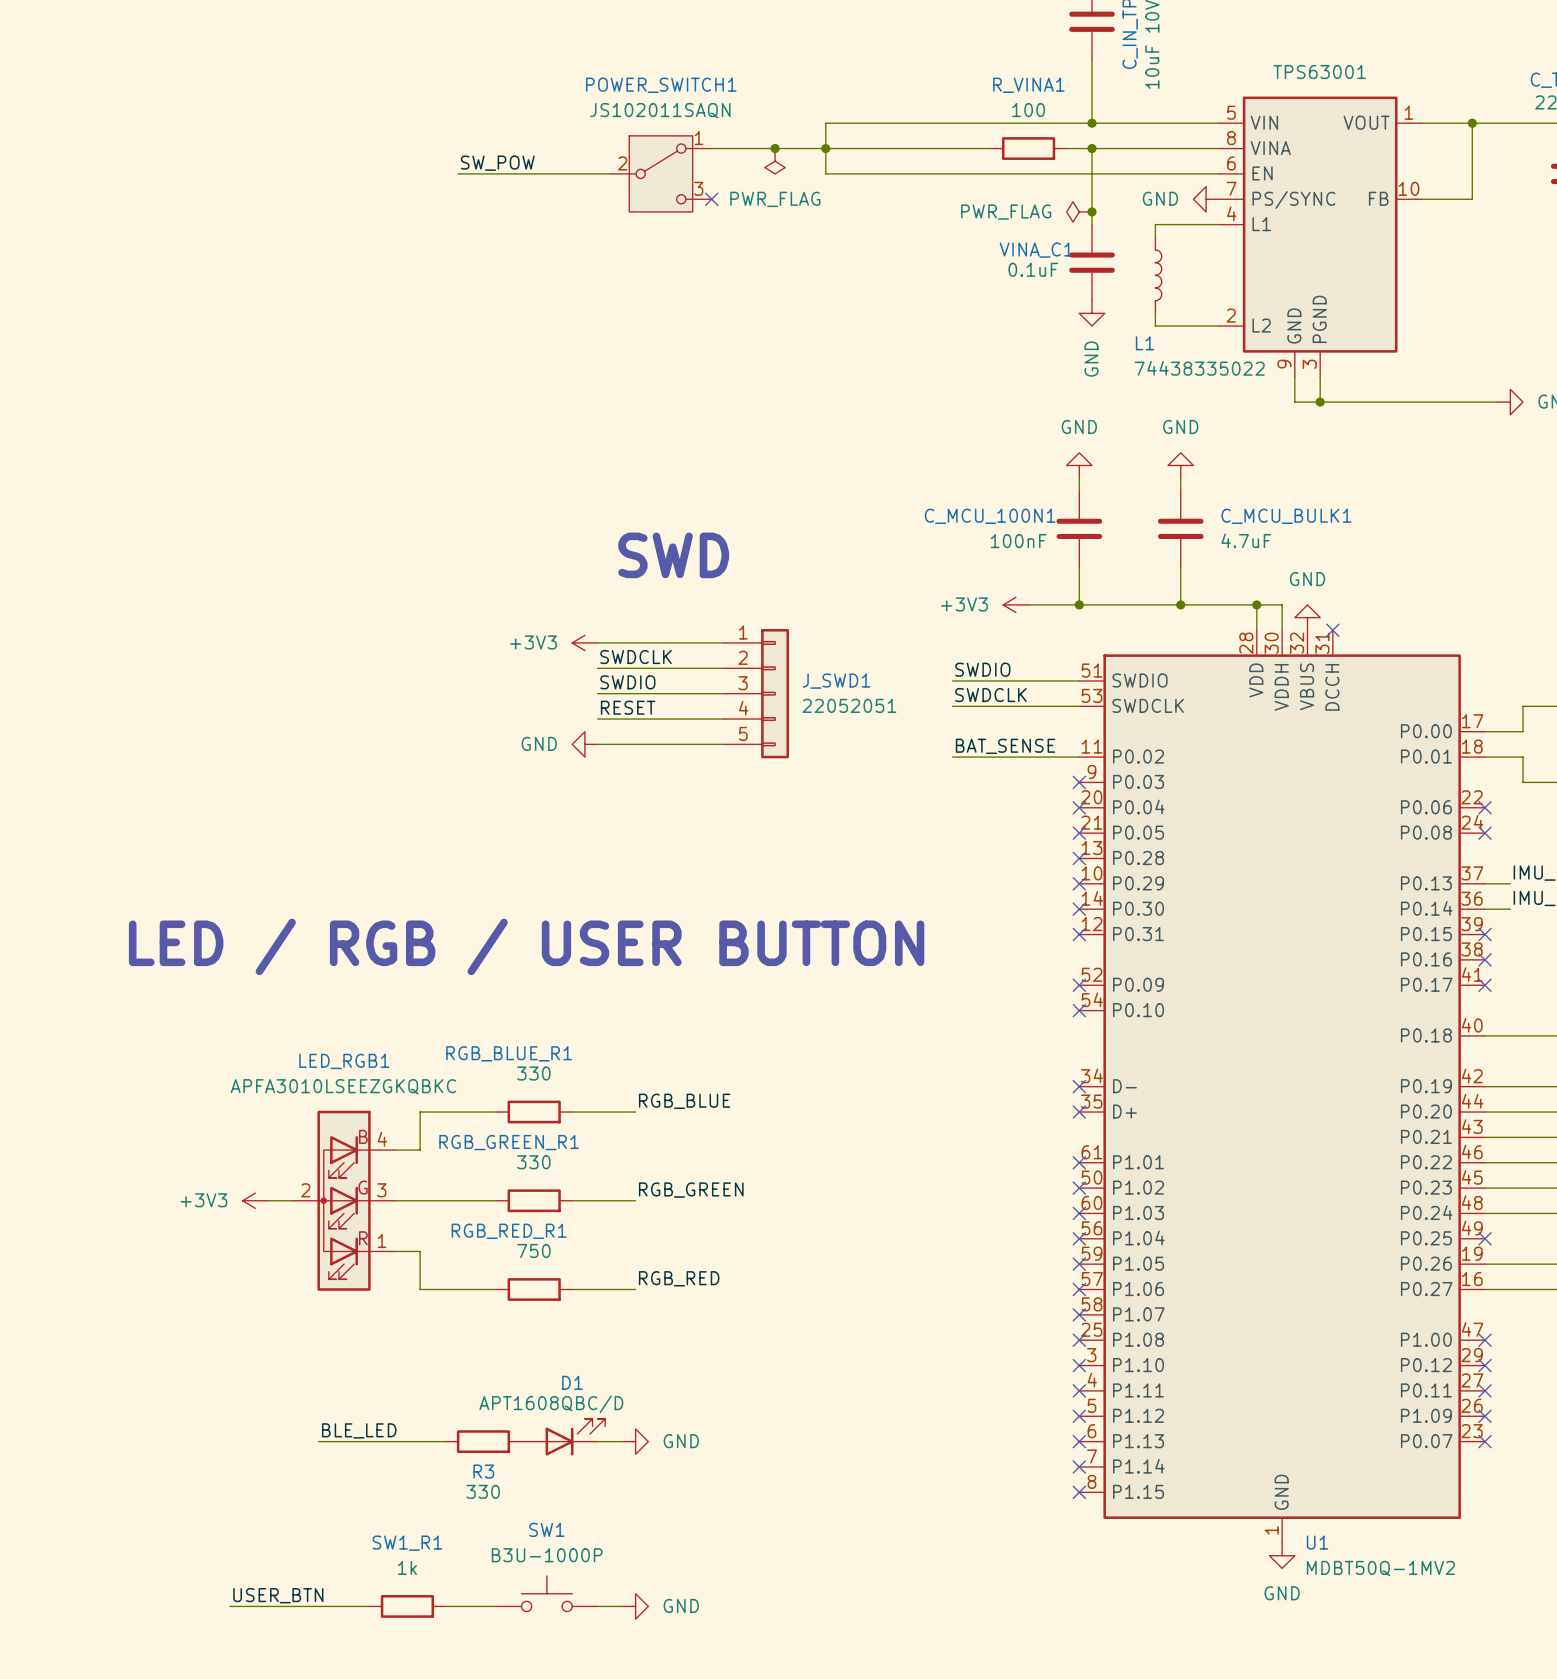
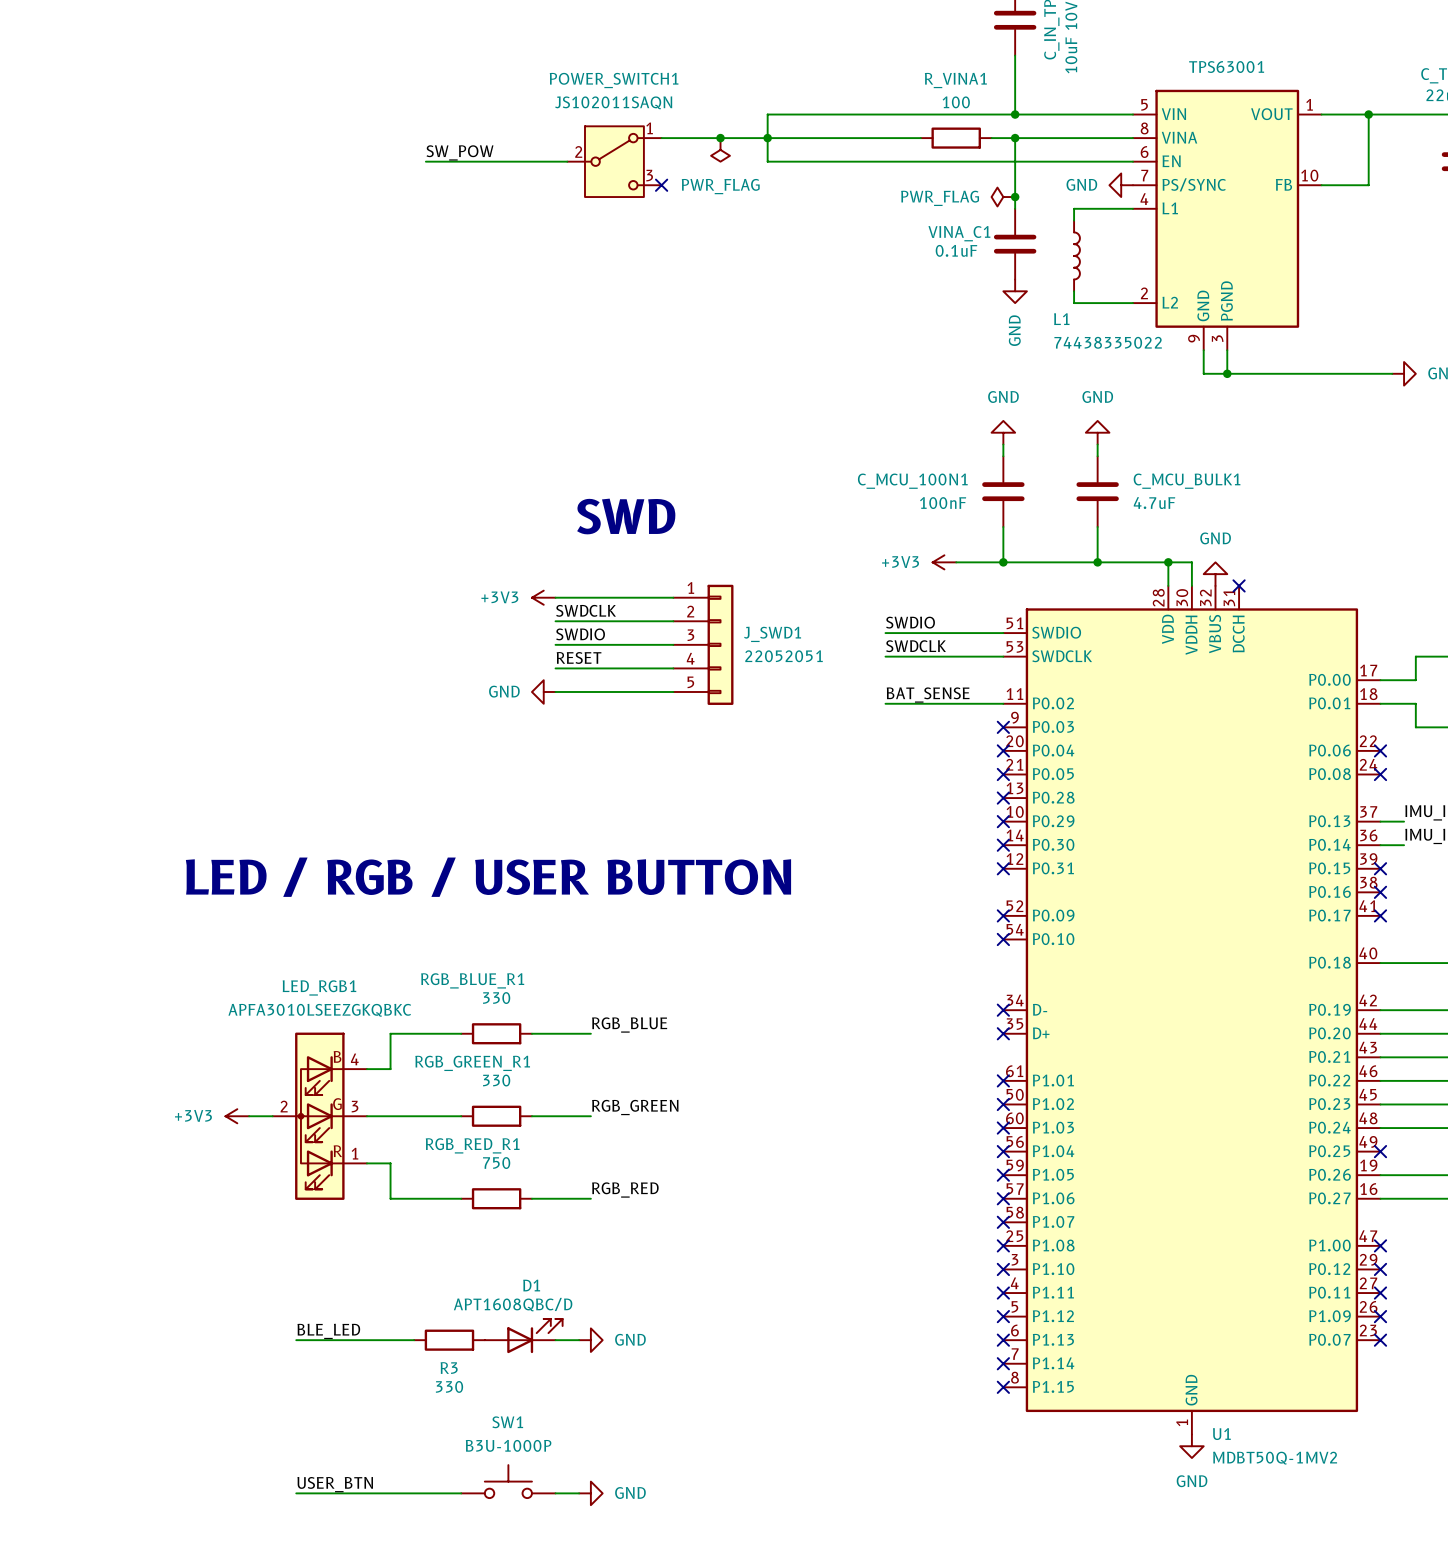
label position: USER_BTN (278, 1595) -> USER_BTN (335, 1484)
wire: (229, 1606) (318, 1606) -> none
wire: none -> (343, 1493) (414, 1493)
SW1_R1: 1k (407, 1606) -> none

